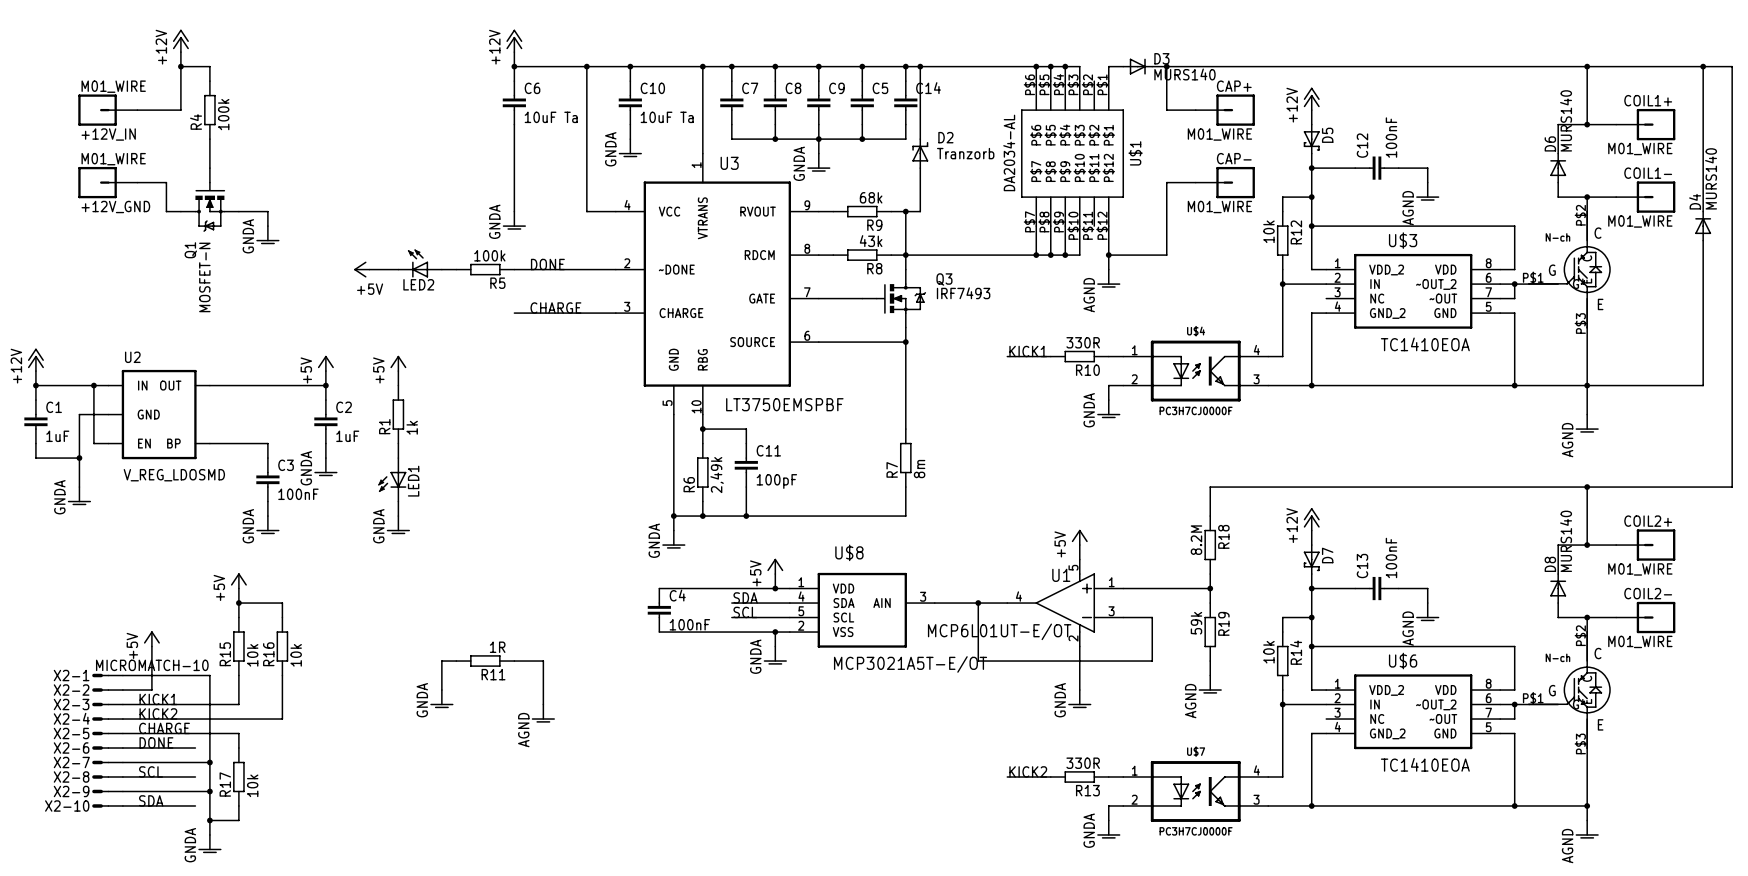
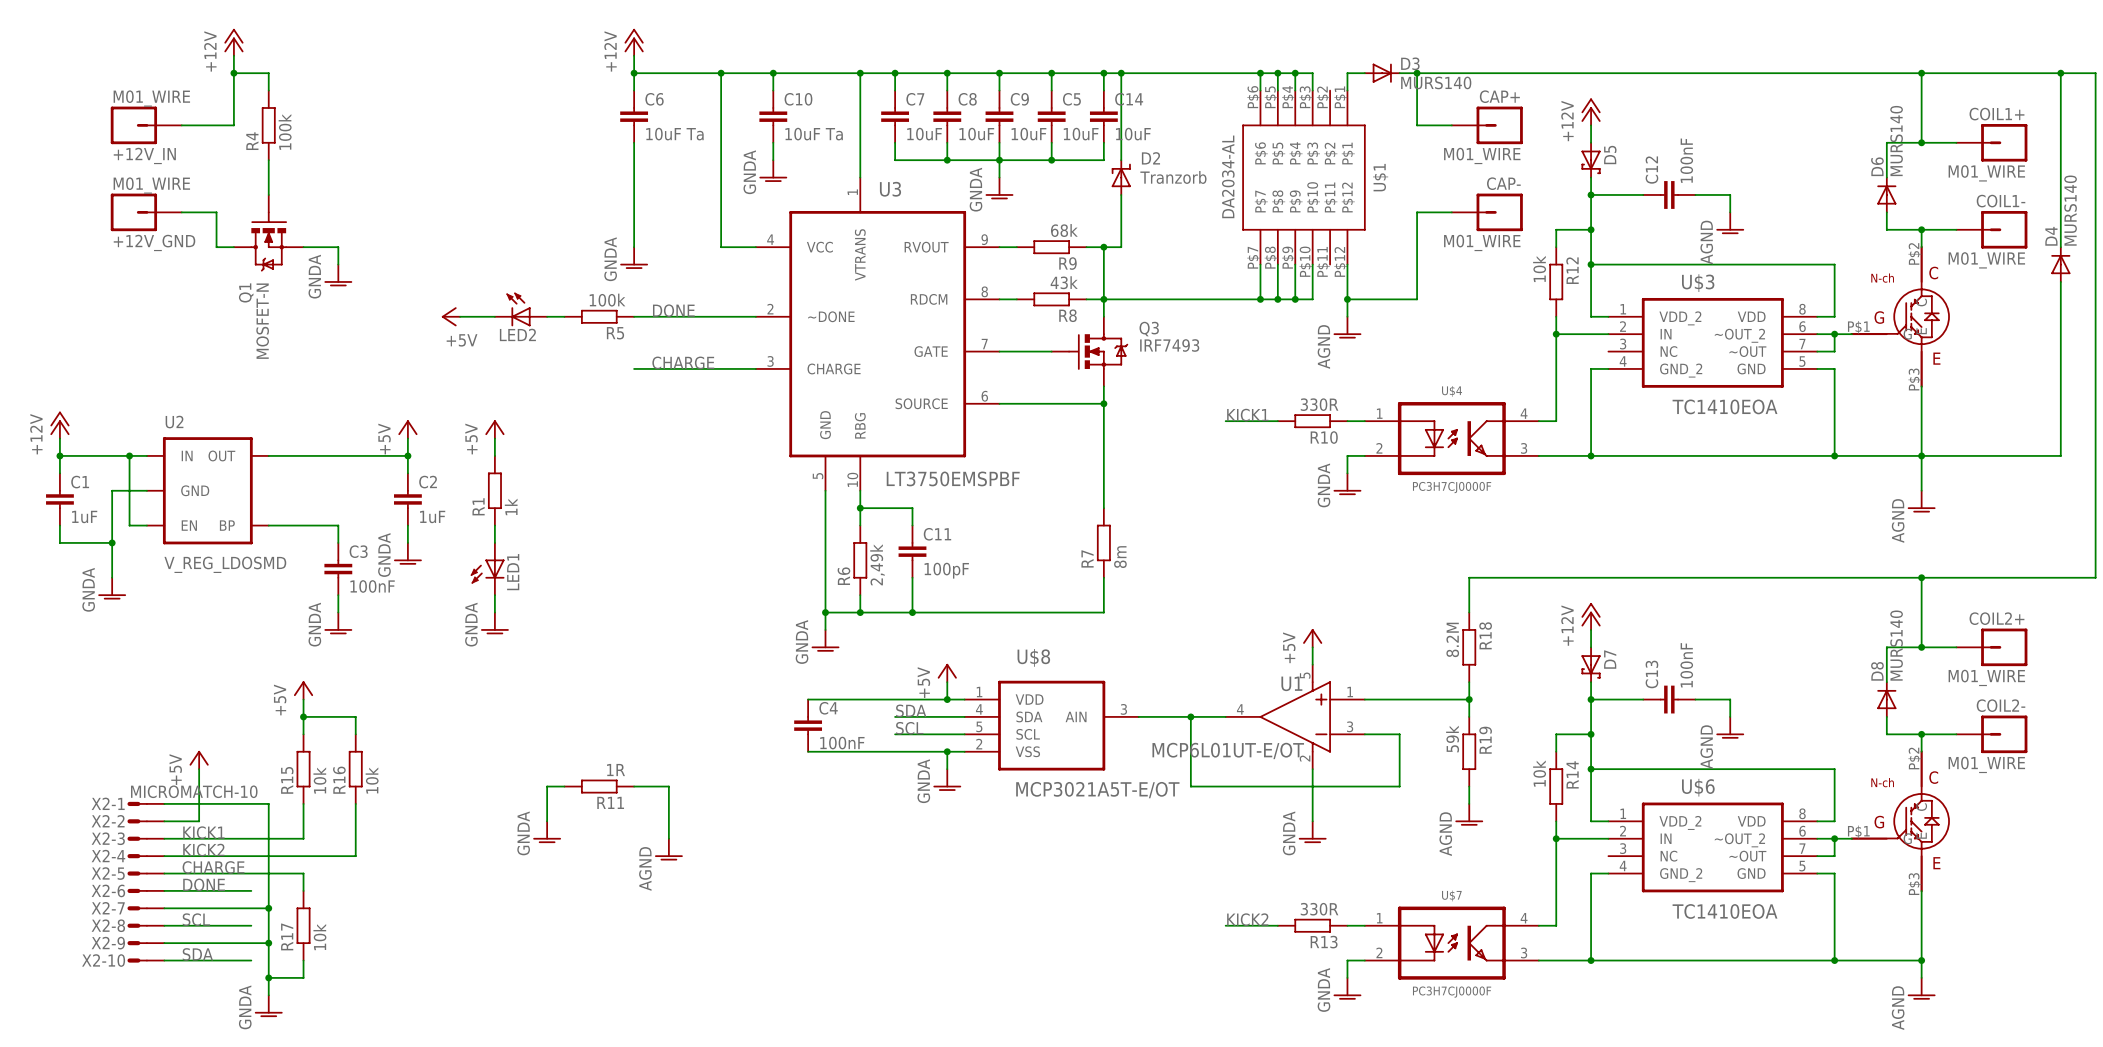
C7 value: none -> 10uF (924, 134)
C8 value: none -> 10uF (976, 134)
C9 value: none -> 10uF (1028, 134)
C5 value: none -> 10uF (1081, 134)
C14 value: none -> 10uF (1133, 134)

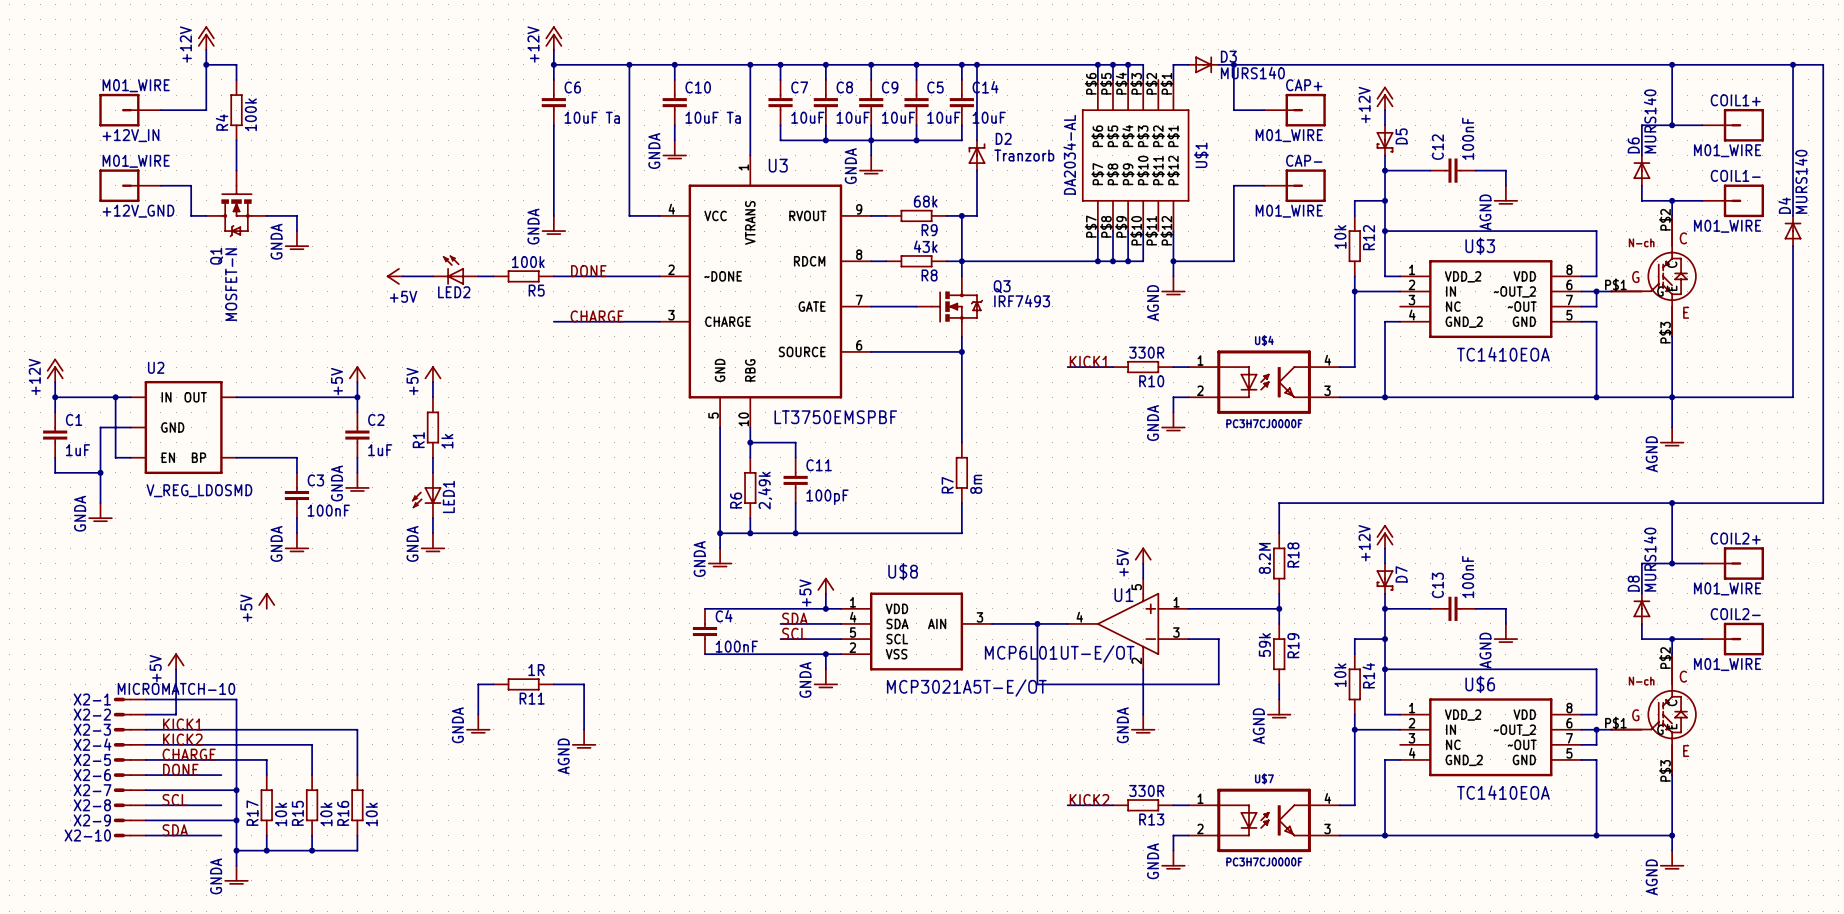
wire: (303, 699) (303, 734) -> none
wire: (303, 716) (355, 716) (355, 734) -> none
junction: (303, 716) -> none
R15 position: (303, 769) -> (312, 805)
R16 position: (355, 769) -> (357, 805)
wire: (303, 803) (303, 838) -> (357, 775) (357, 729) (266, 729)
wire: (355, 803) (355, 856) -> (312, 775) (312, 744)
wire: none -> (312, 835) (312, 850)
wire: none -> (357, 835) (357, 850) (266, 850)
junction: none -> (266, 850)
junction: none -> (312, 850)

